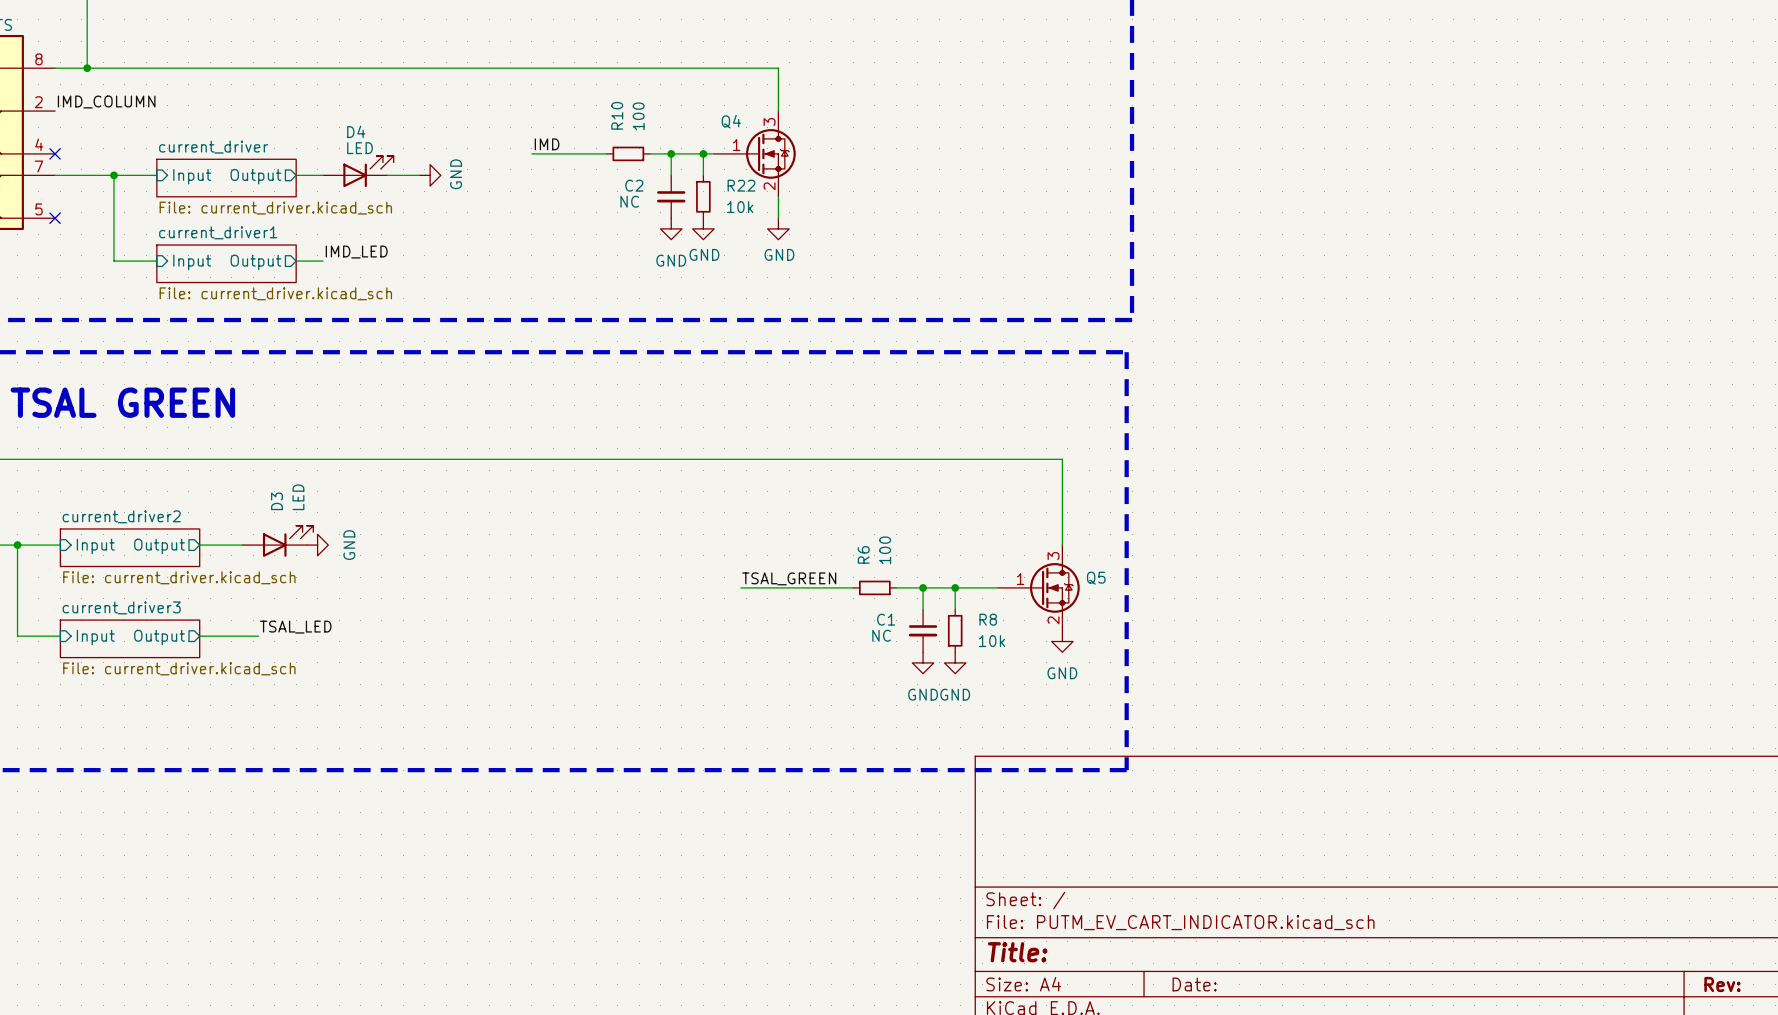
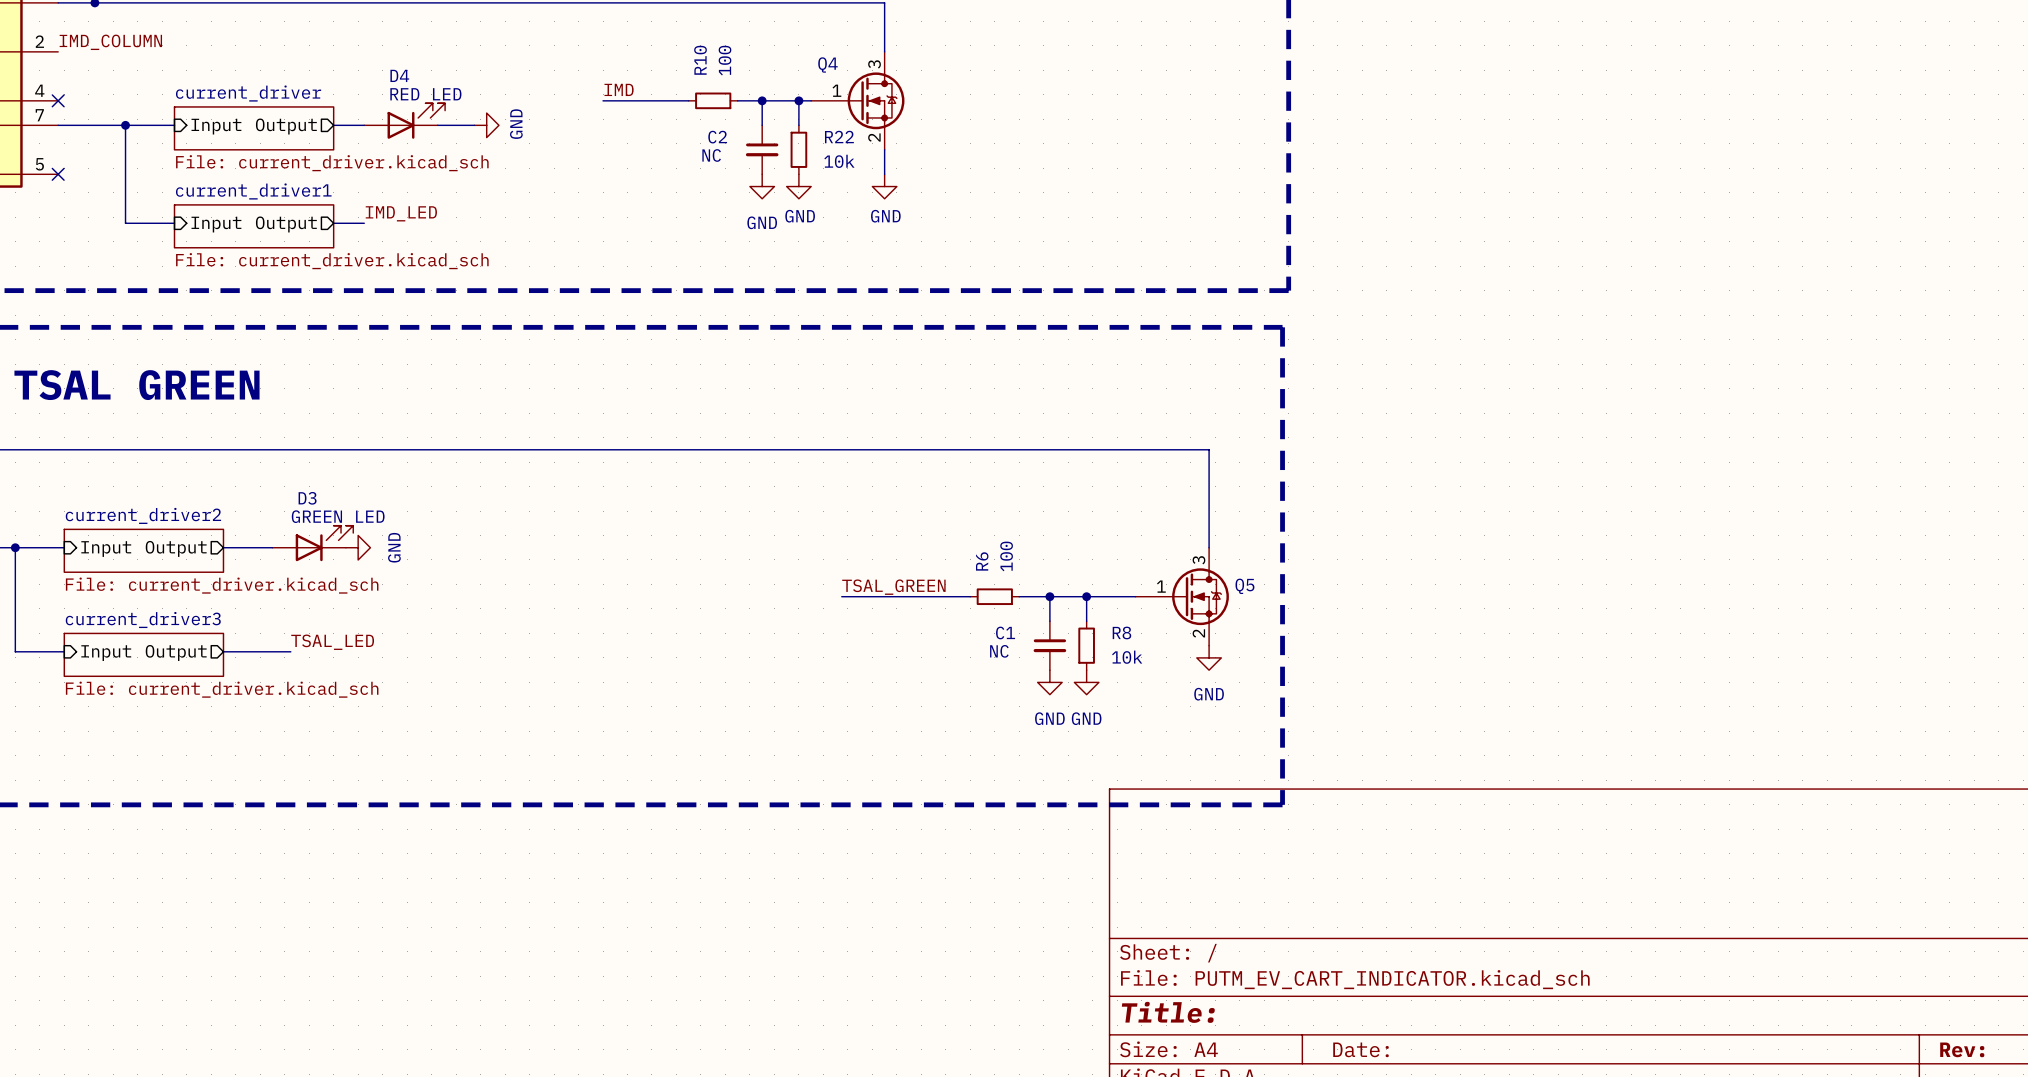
D4 value: LED (360, 148) -> RED LED (425, 94)
D3 value: LED (298, 497) -> GREEN LED (338, 516)
D3 name rotation: 0° (277, 501) -> 90° clockwise (307, 498)

